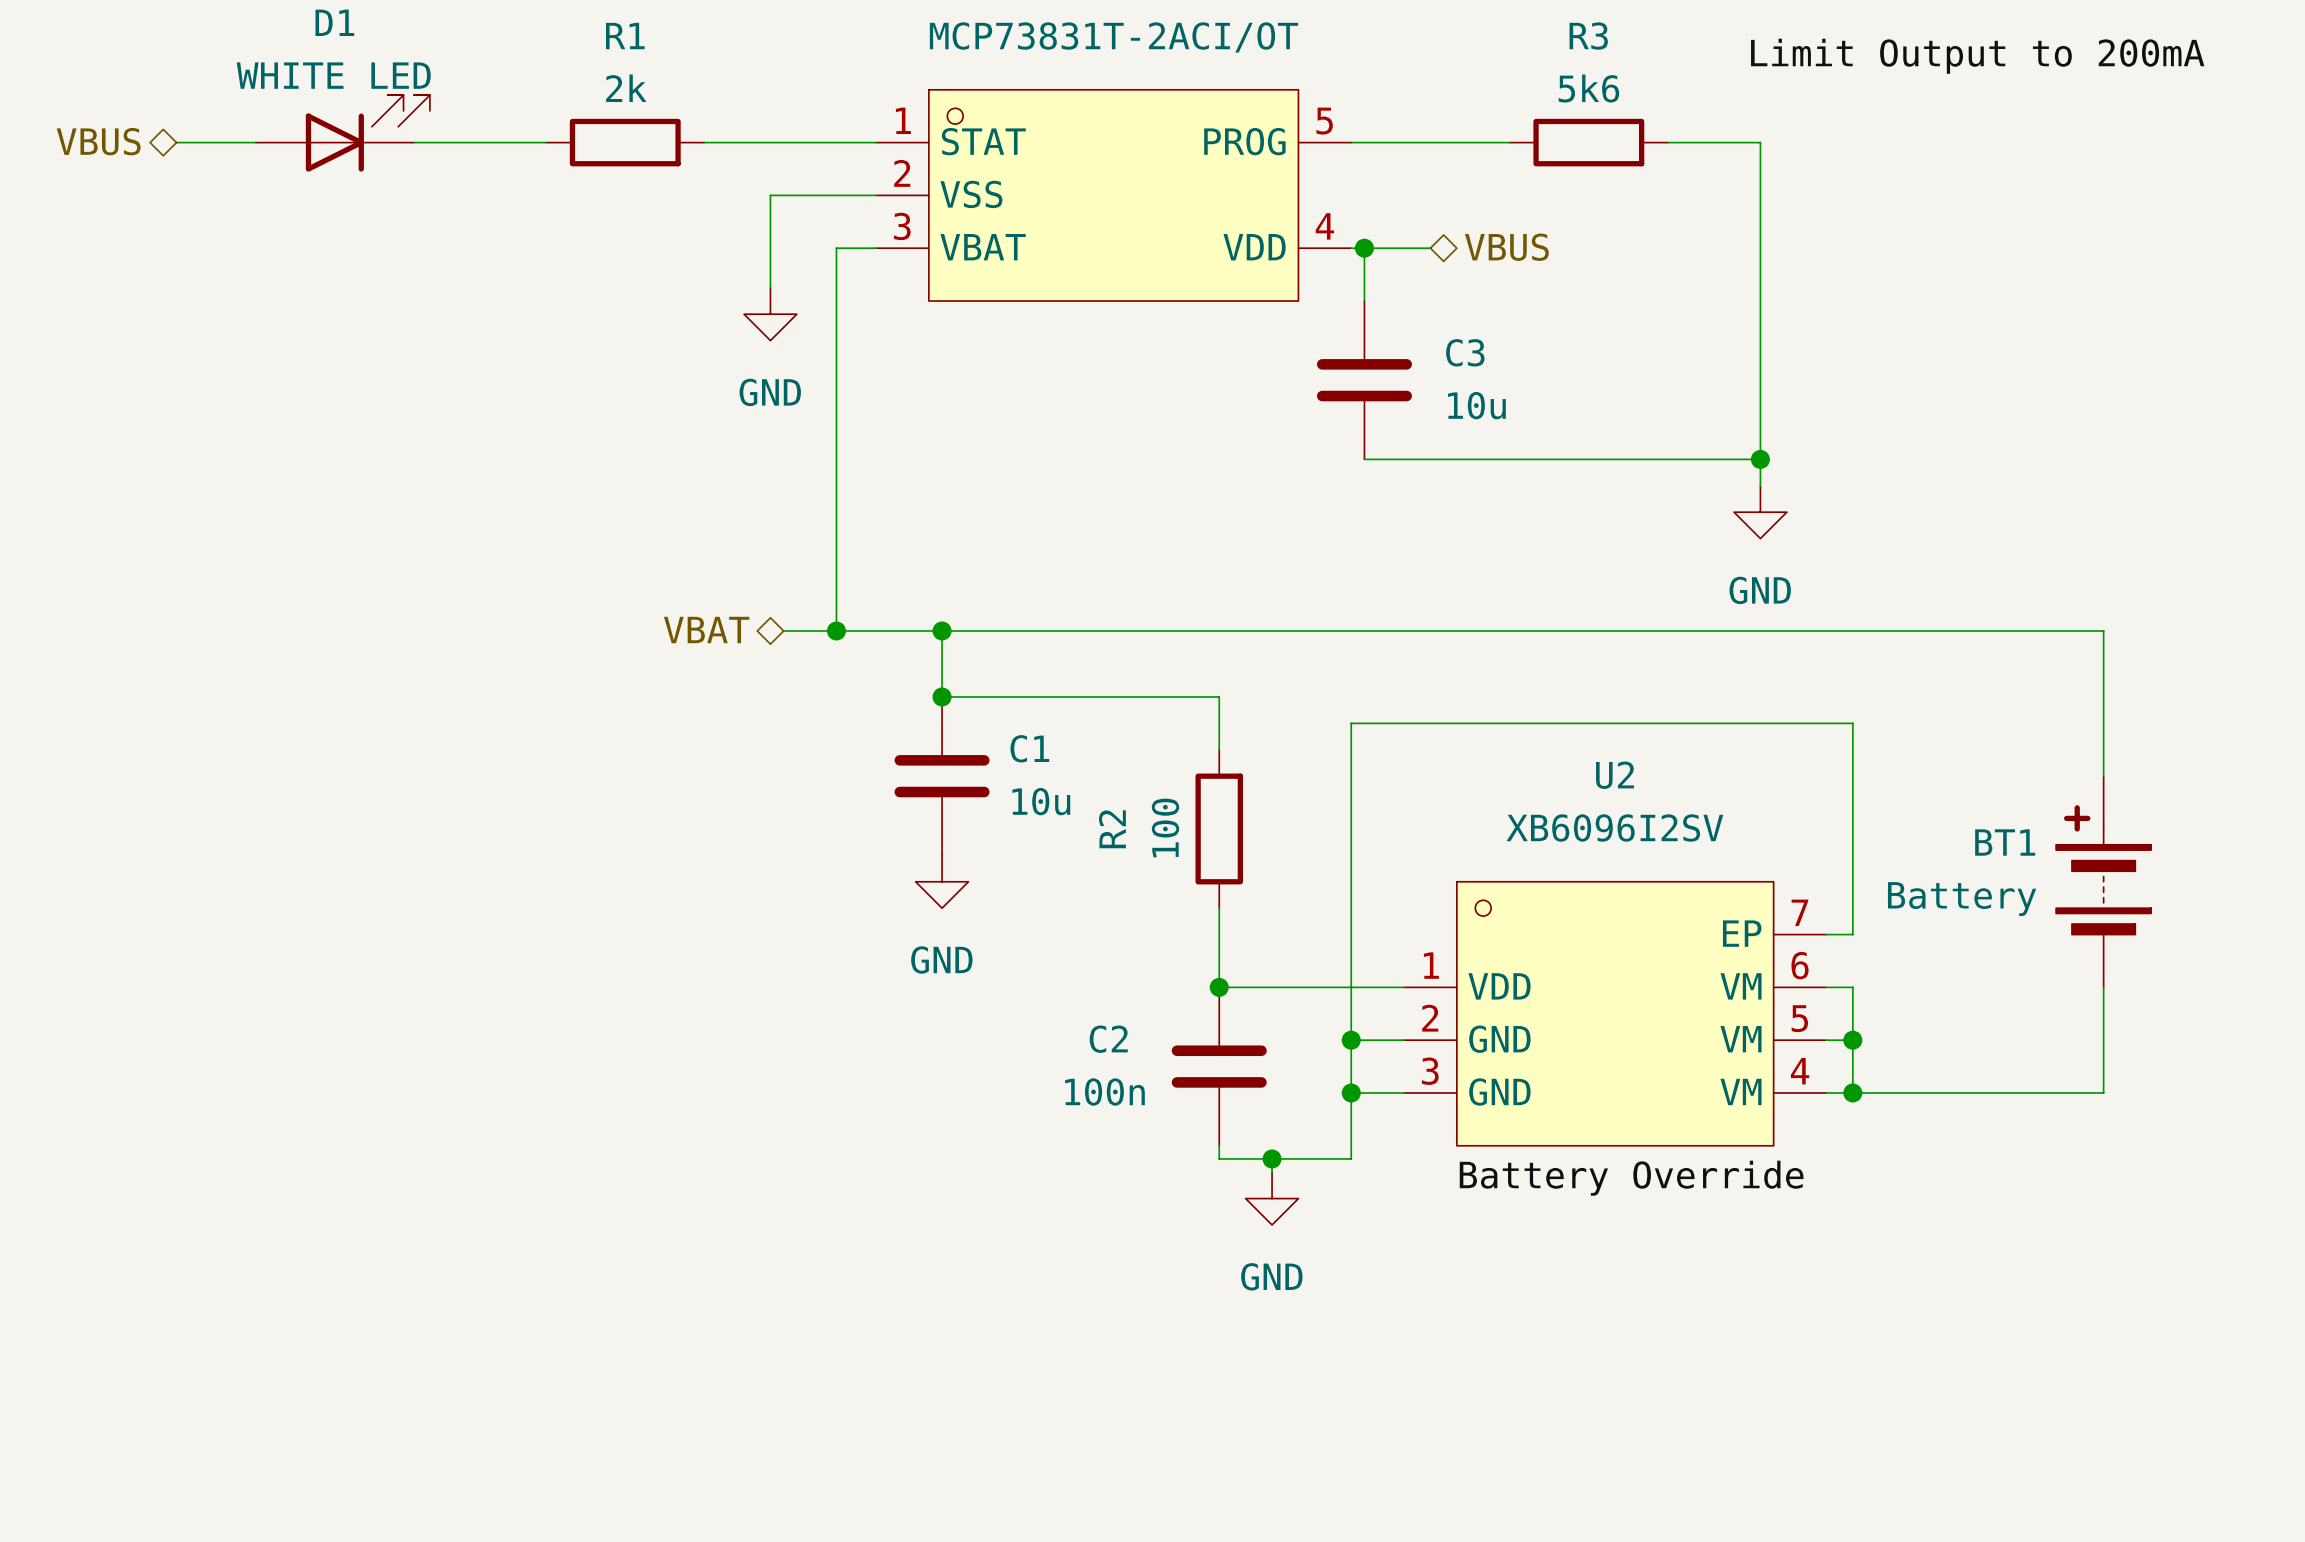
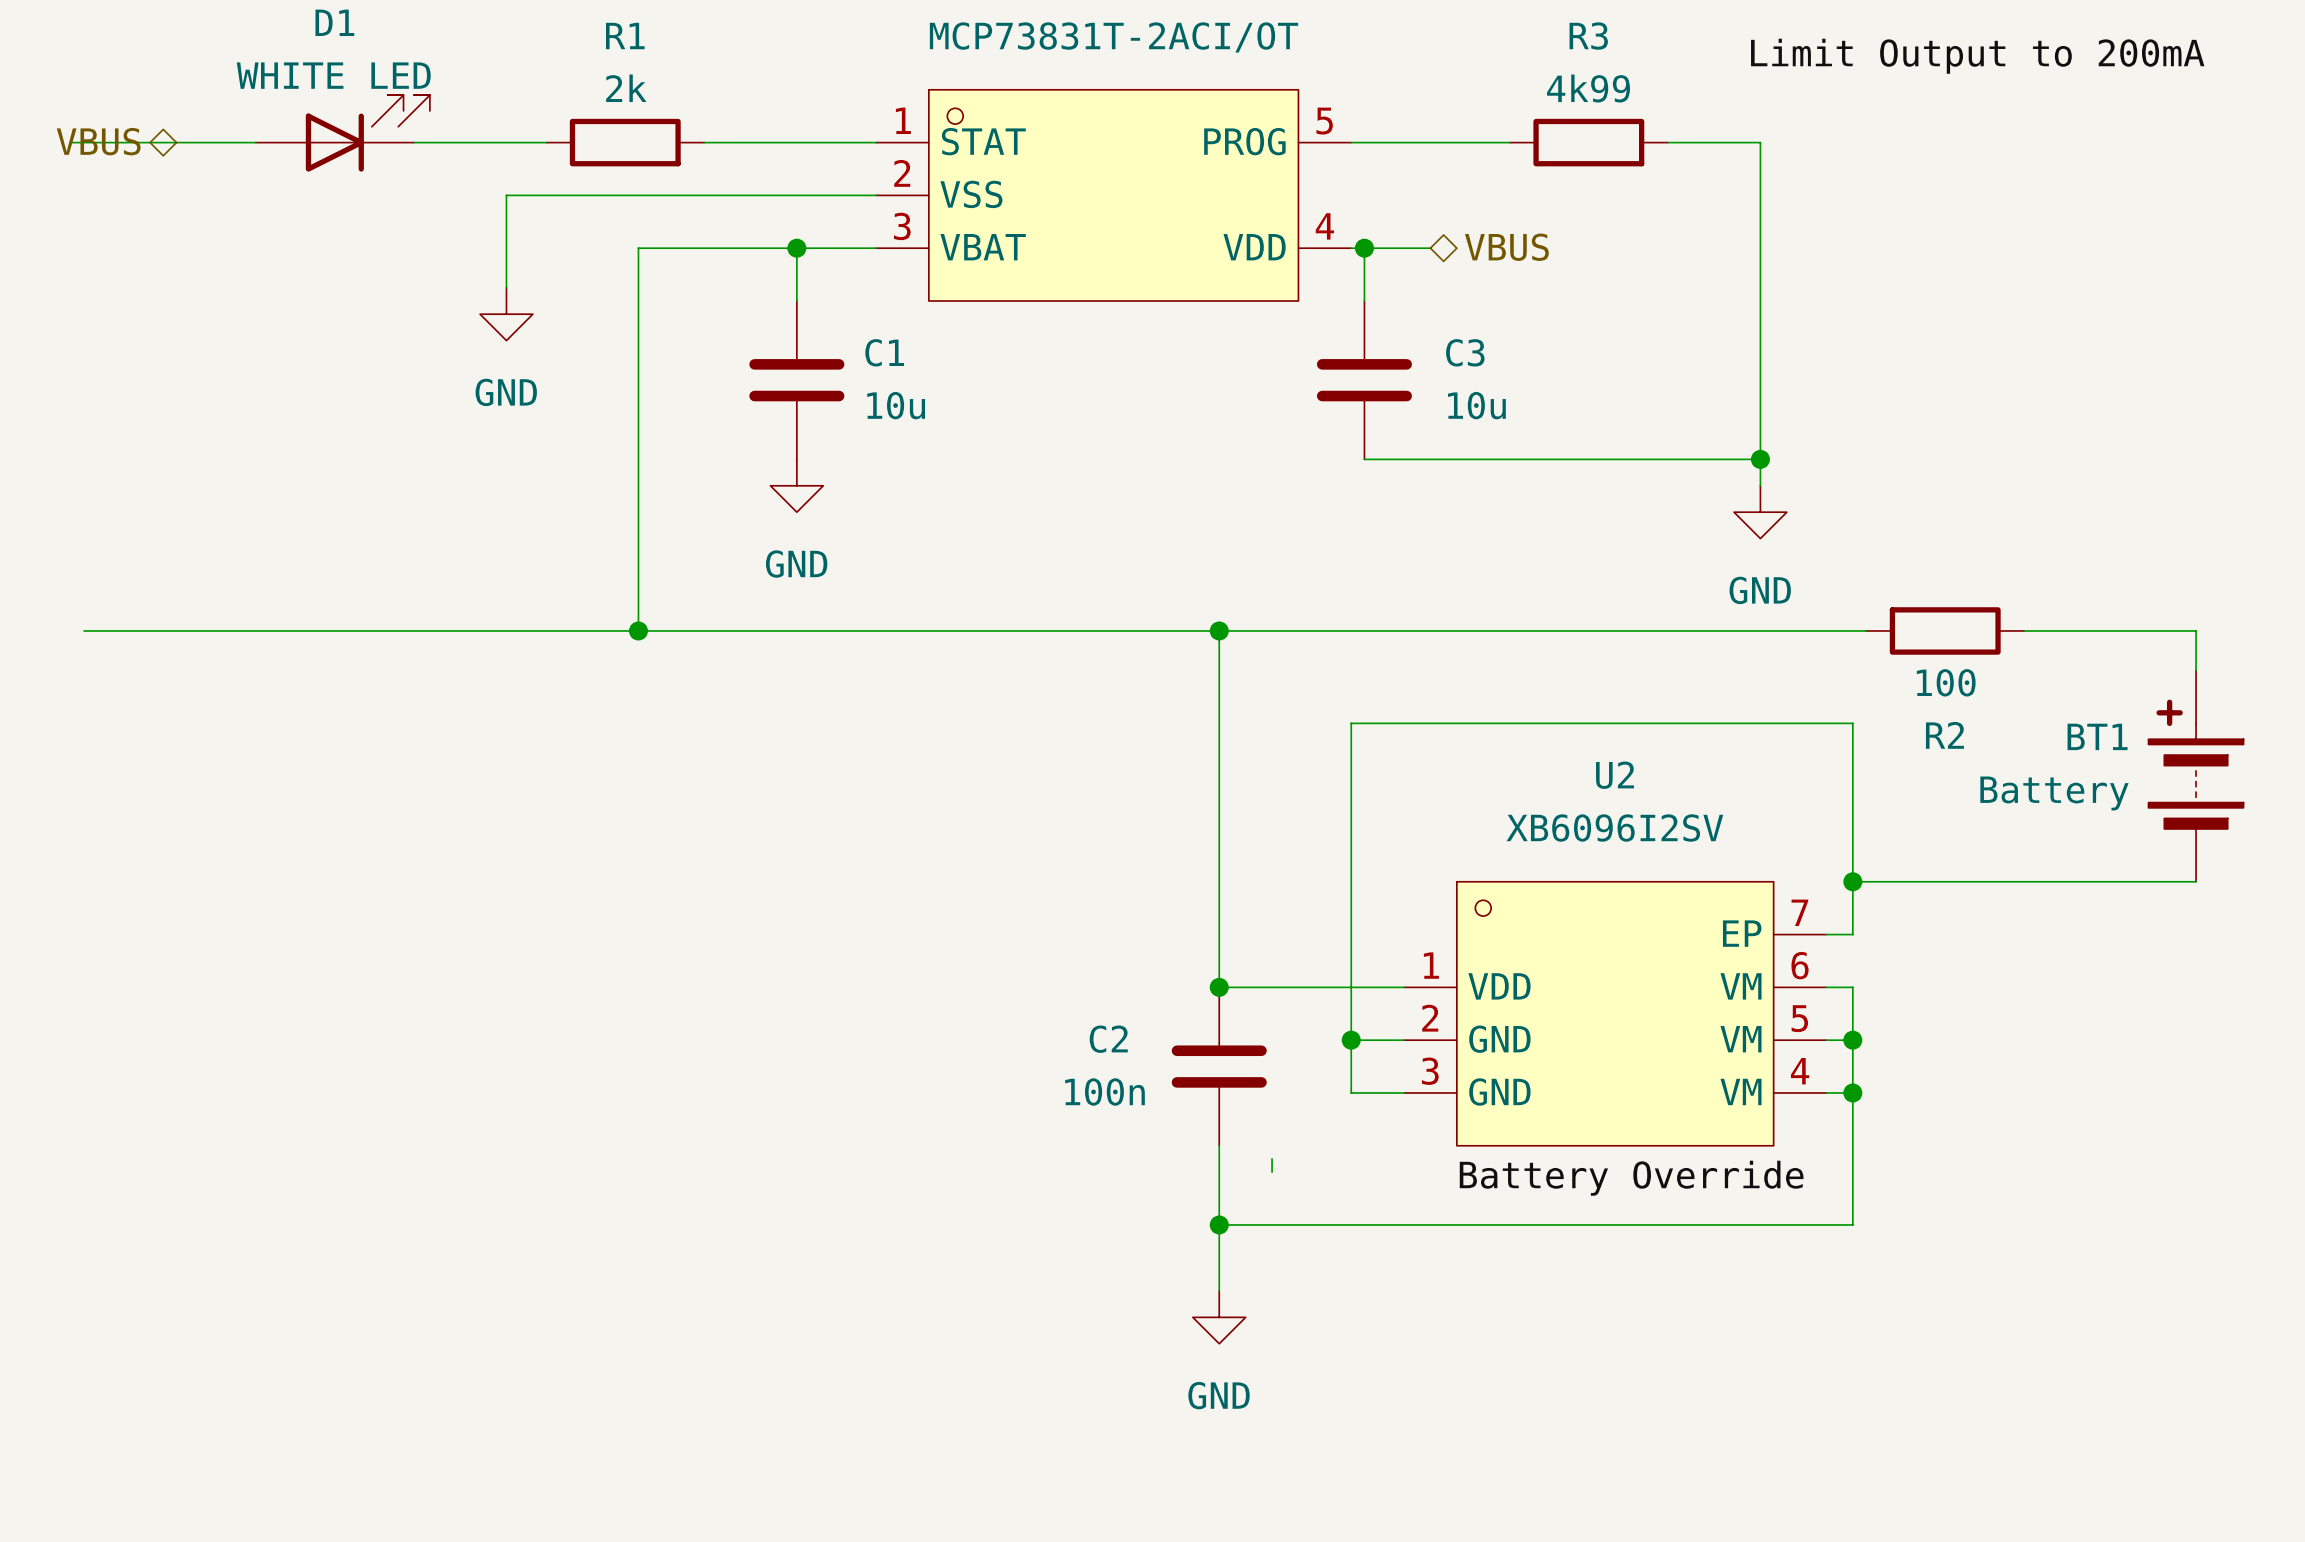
R3 value: 5k6 (1588, 88) -> 4k99 (1588, 88)
wire: none -> (70, 142) (176, 142)
wire: (770, 195) (770, 287) -> (770, 195) (506, 195) (506, 287)
wire: none -> (796, 248) (796, 300)
junction: none -> (796, 248)
wire: (836, 248) (836, 630) -> (836, 248) (638, 248) (638, 630)
power symbol: none -> GND (506, 314)
power symbol: GND (770, 314) -> none
power symbol: none -> GND (796, 485)
wire: none -> (84, 630) (783, 630)
junction: none -> (638, 630)
hierarchical label: VBAT (706, 630) -> none
junction: (836, 630) -> none
wire: (942, 630) (942, 696) (1219, 696) -> (1219, 630) (1219, 696)
junction: (942, 630) -> none
junction: none -> (1219, 630)
wire: (1866, 630) (2024, 630) -> none
wire: (2103, 630) (2103, 776) -> (2103, 630) (2196, 630) (2196, 670)
junction: (942, 696) -> none
wire: none -> (1219, 749) (1219, 908)
C1 position: (942, 776) -> (796, 380)
R2 value position: 100 (1165, 827) -> 100 (1946, 682)
R2 rotation: 0° (1219, 828) -> 90° clockwise (1945, 630)
R2 position: (1219, 828) -> (1945, 630)
R2 name position: R2 (1112, 829) -> R2 (1944, 735)
power symbol: GND (942, 881) -> none
wire: none -> (1852, 881) (2196, 881)
junction: none -> (1852, 881)
BT1 position: (2103, 881) -> (2196, 776)
wire: (2103, 987) (2103, 1092) (1852, 1092) -> (1219, 1224) (1852, 1224) (1852, 1092)
wire: (1351, 1092) (1351, 1158) (1219, 1158) -> (1219, 1290) (1219, 1158)
junction: (1351, 1092) -> none
junction position: (1272, 1158) -> (1219, 1224)
power symbol position: GND (1272, 1198) -> GND (1219, 1317)

